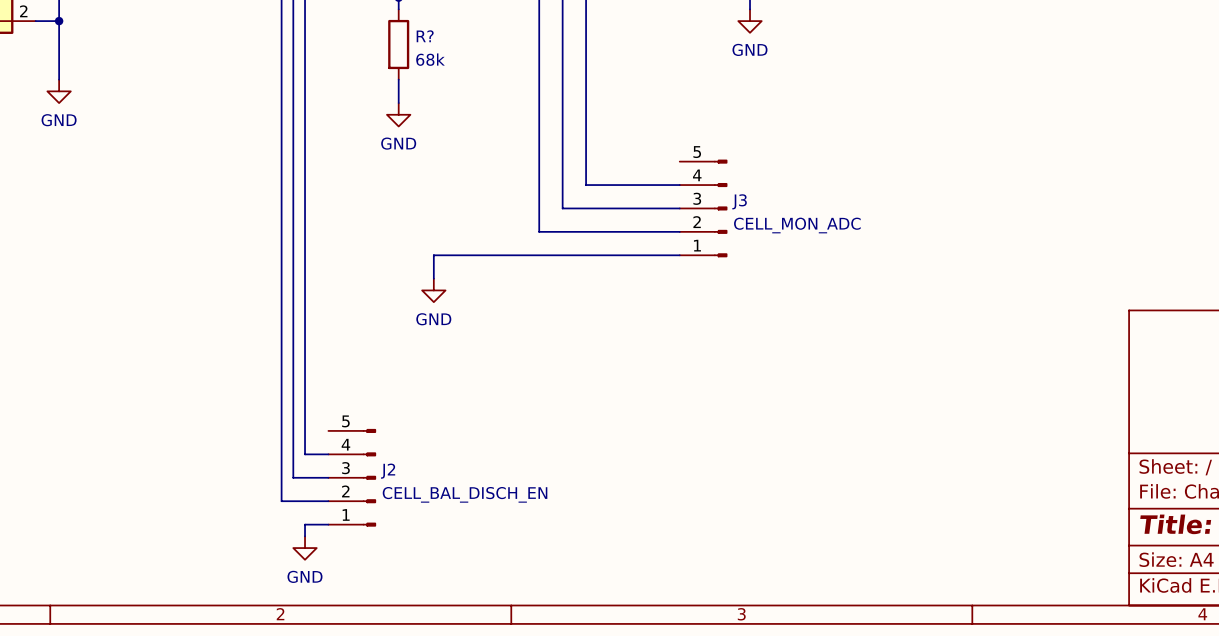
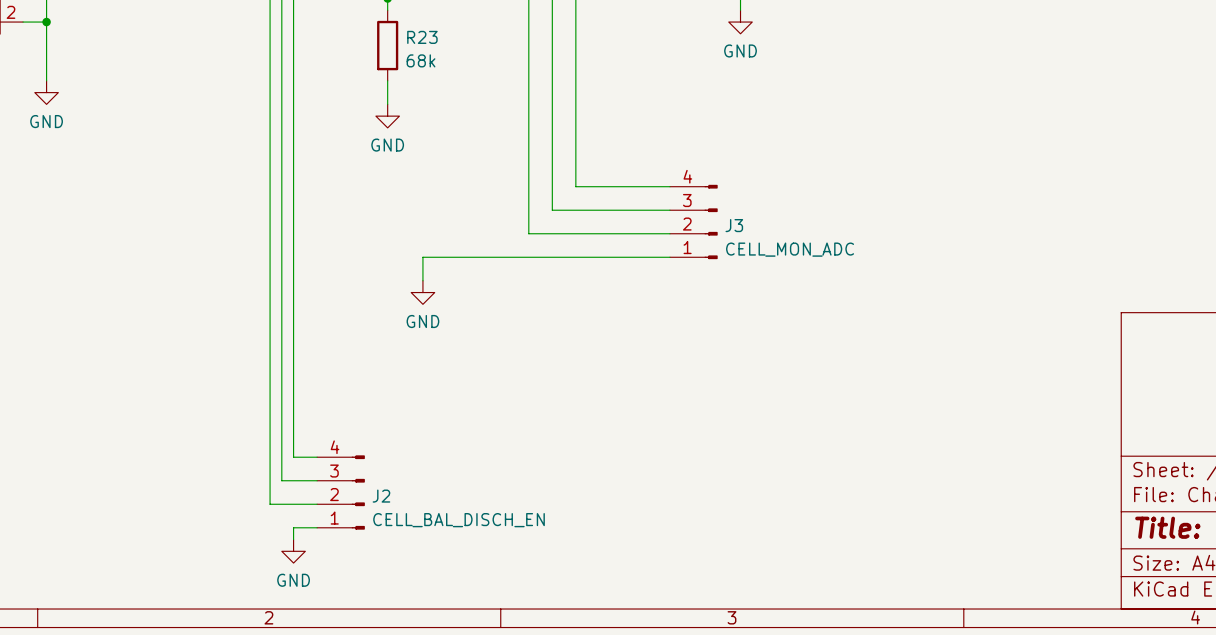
R? name: R? (425, 36) -> R23 (422, 37)
J3 symbol: [679, 159, 728, 258] -> [669, 184, 718, 260]
J2 symbol: [328, 429, 376, 527] -> [317, 455, 365, 530]

